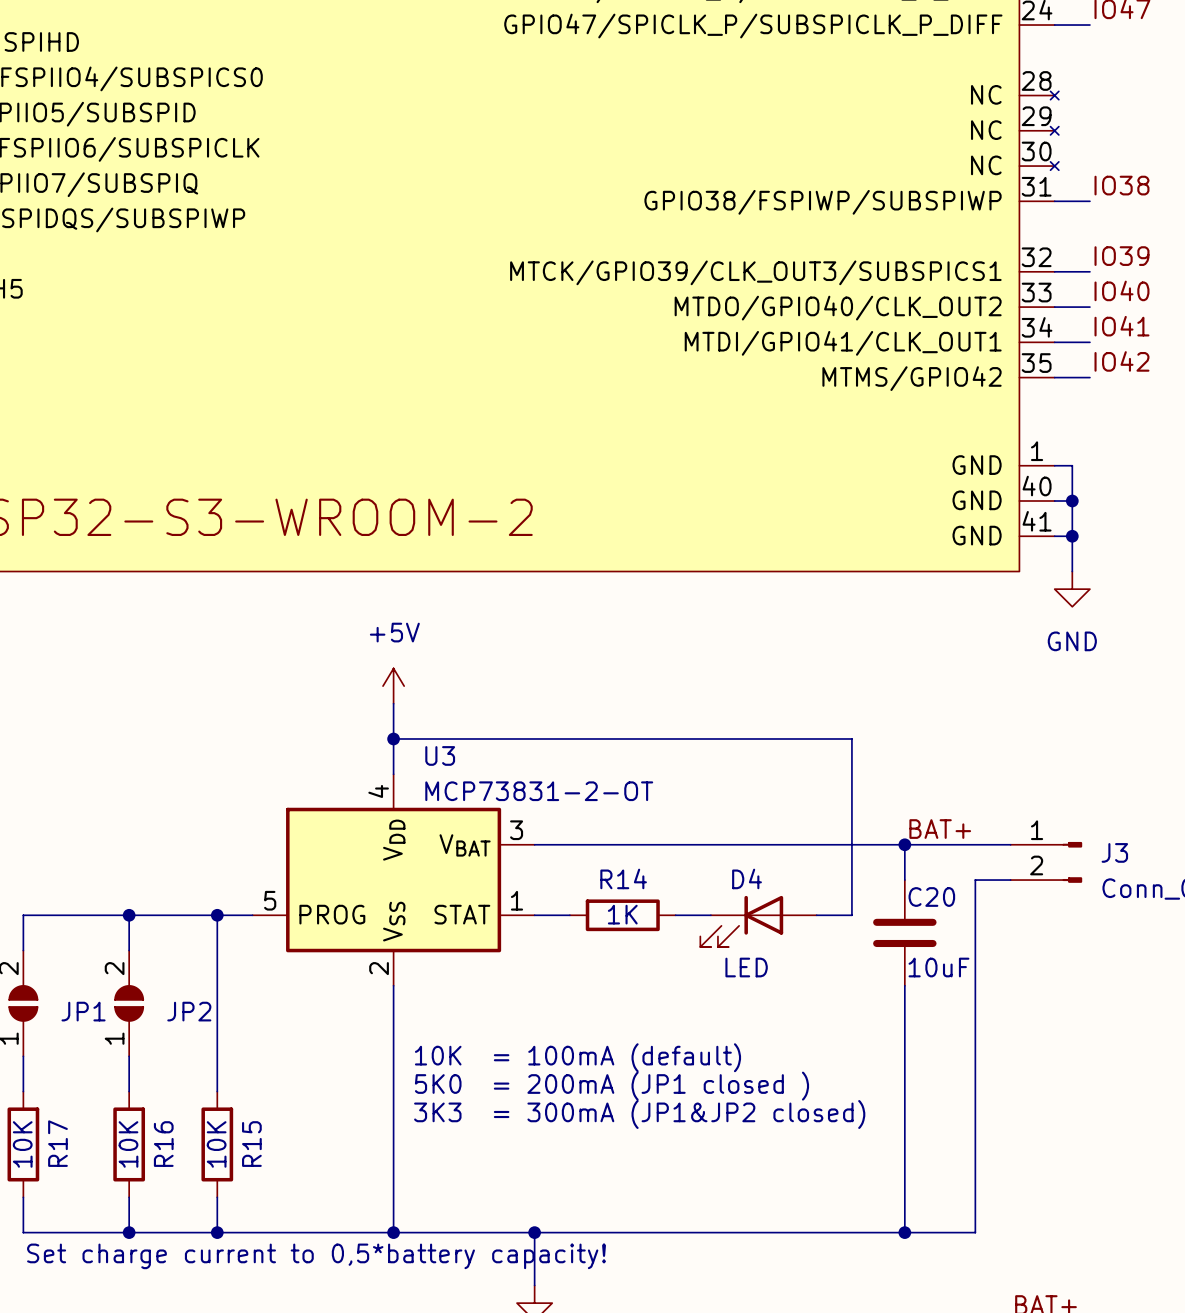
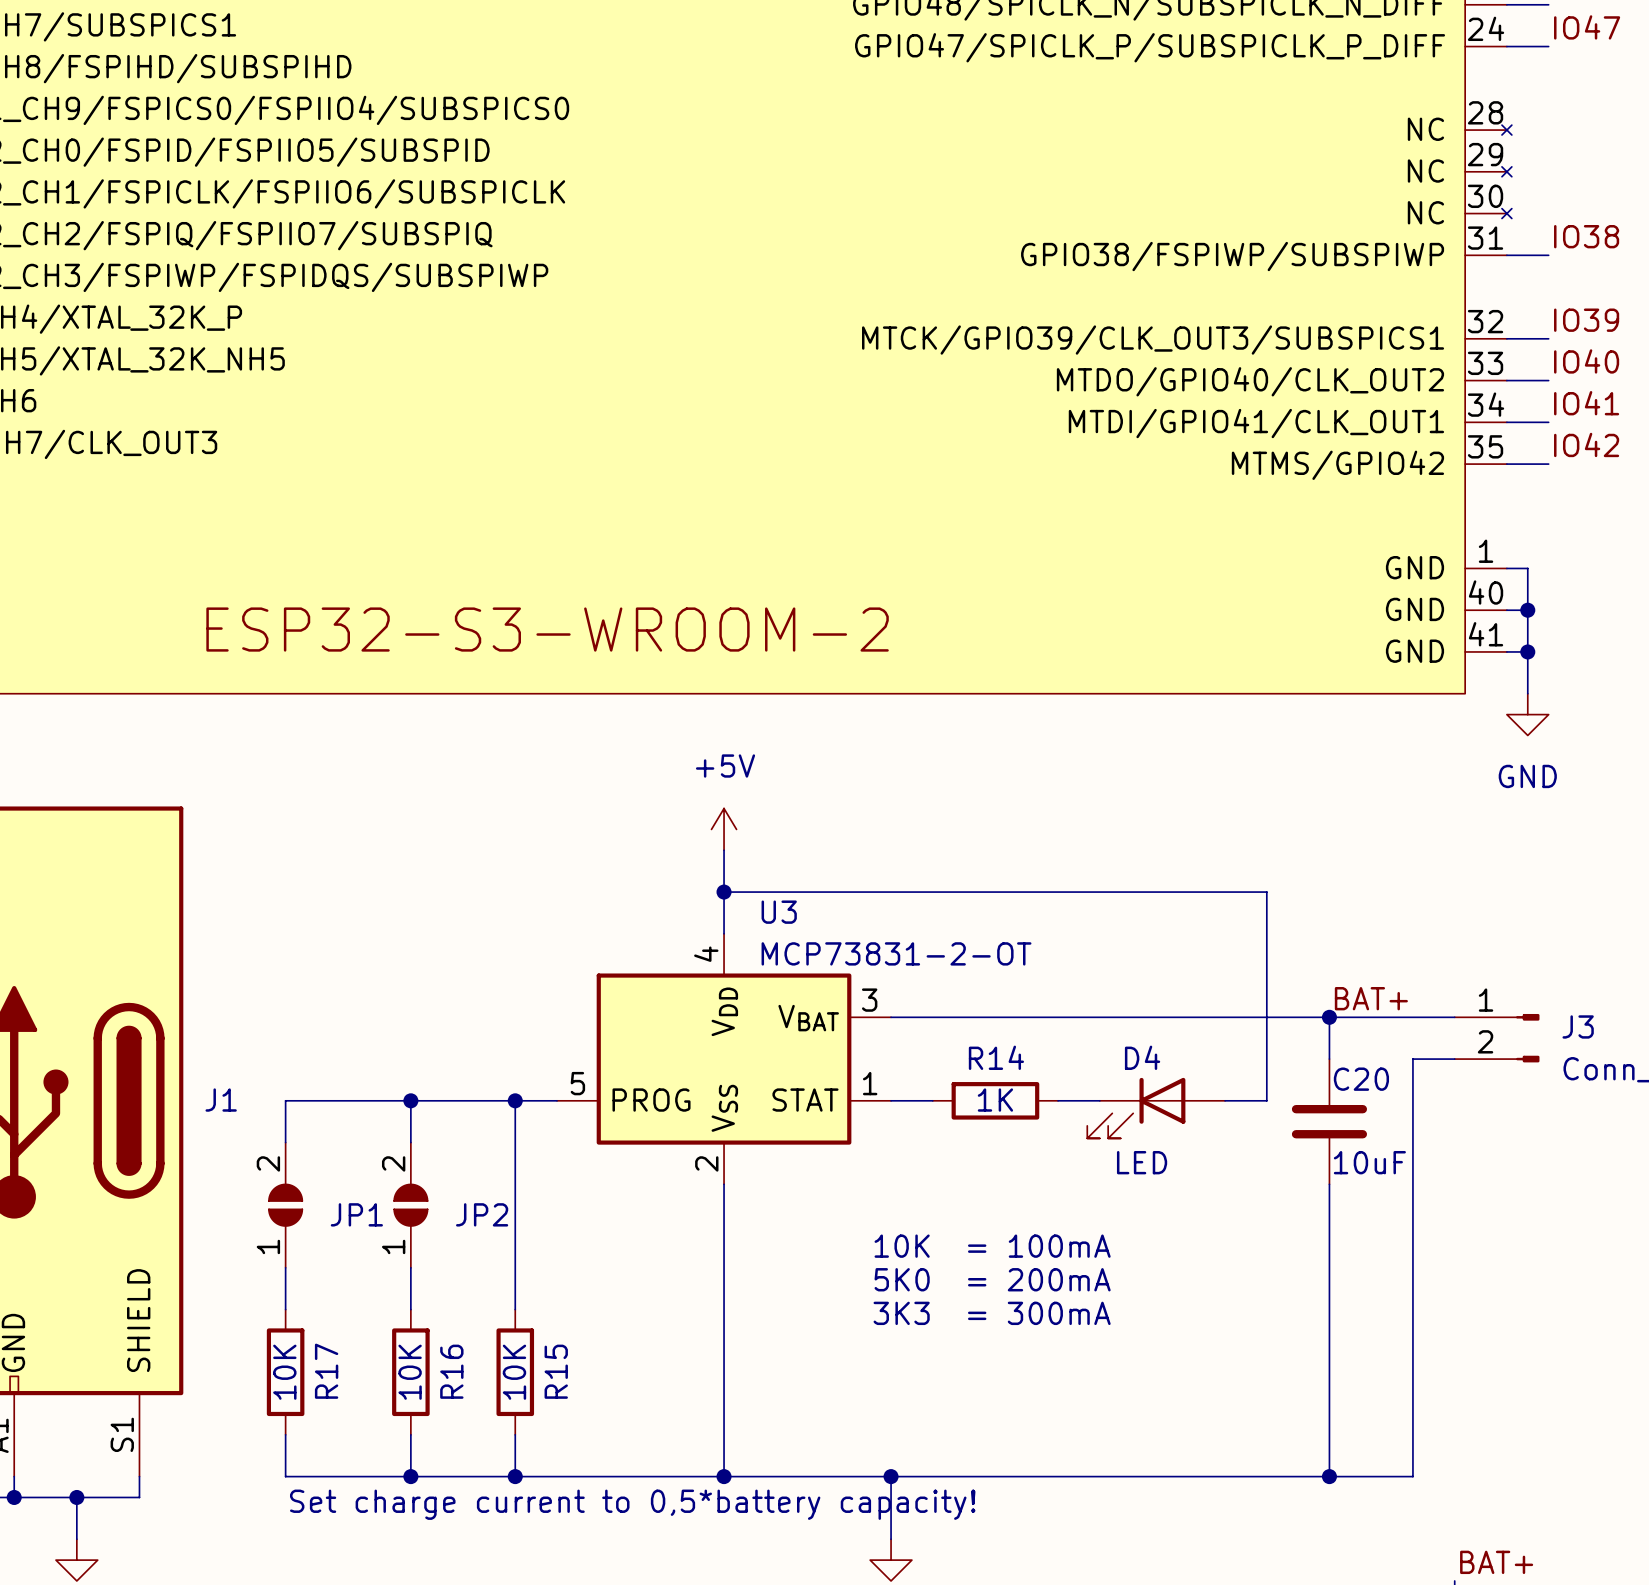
text: 10K = 100mA (default) (577, 1057) -> 10K = 100mA (992, 1246)
text: 5K0 = 200mA (JP1 closed ) (611, 1086) -> 5K0 = 200mA (992, 1279)
text: none -> 3K3 = 300mA (992, 1313)
text: 3K3 = 300mA (JP1&JP2 closed) (639, 1114) -> none

